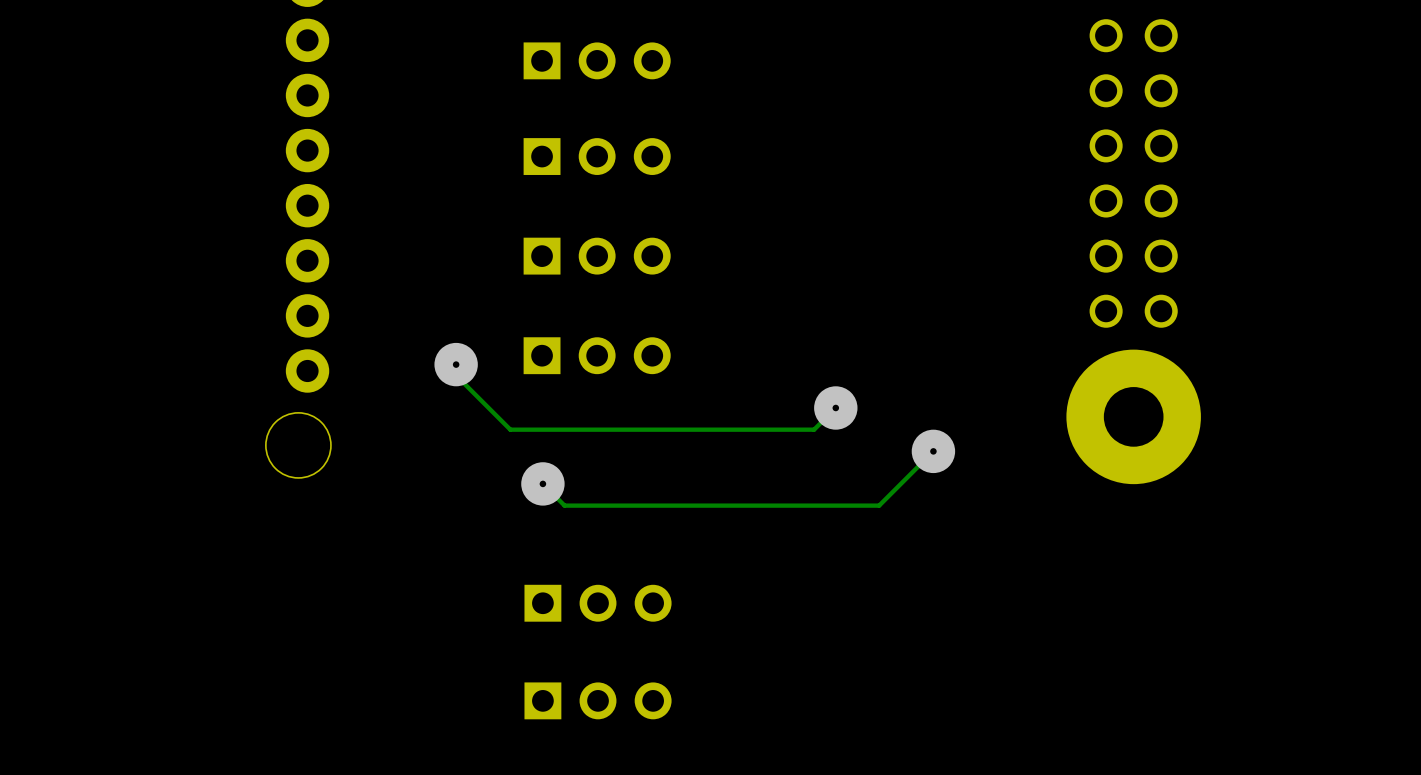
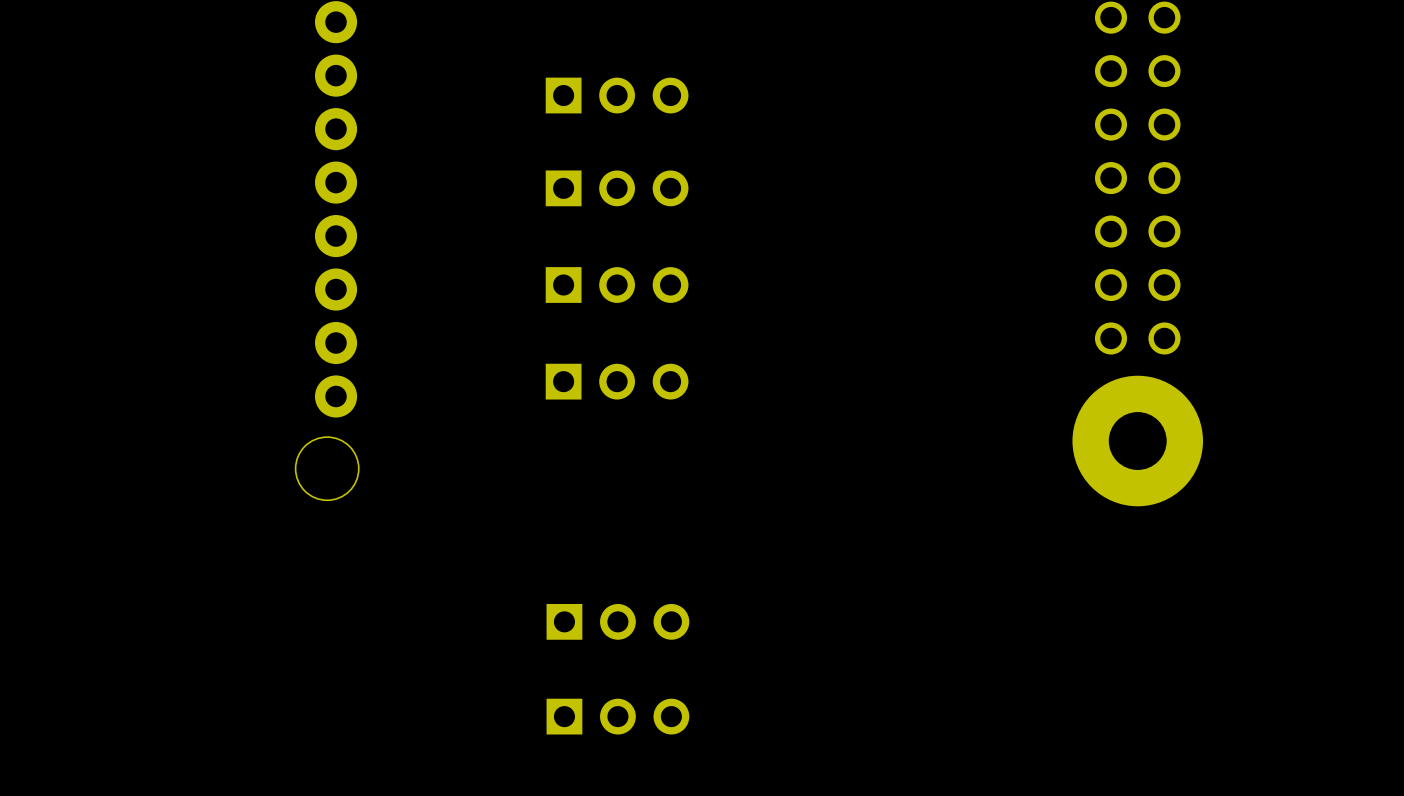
track: (456, 364) (456, 375) (510, 429) (814, 429) (835, 407) -> none
via: (456, 364) -> none
via: (835, 407) -> none
track: (933, 451) (879, 505) (564, 505) (542, 483) -> none
via: (933, 451) -> none
via: (542, 483) -> none

